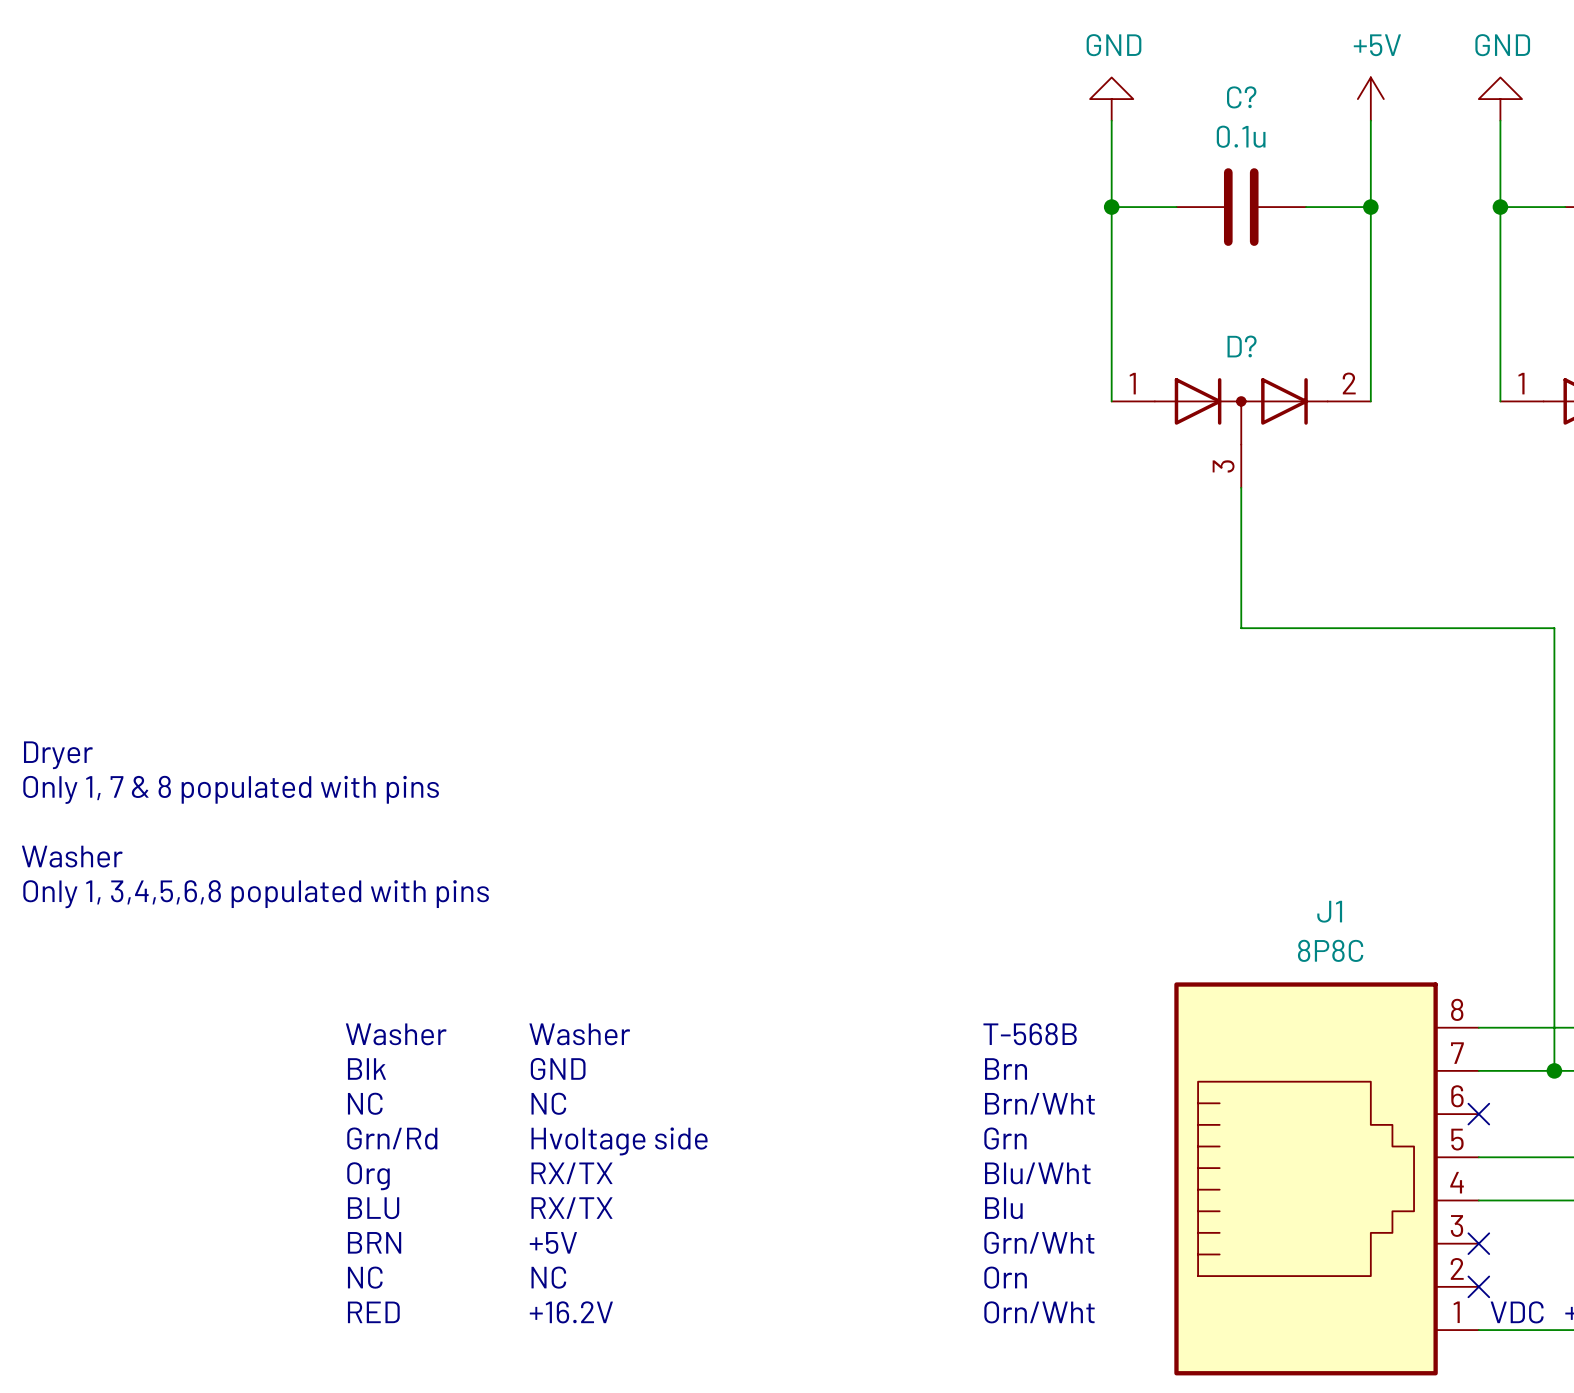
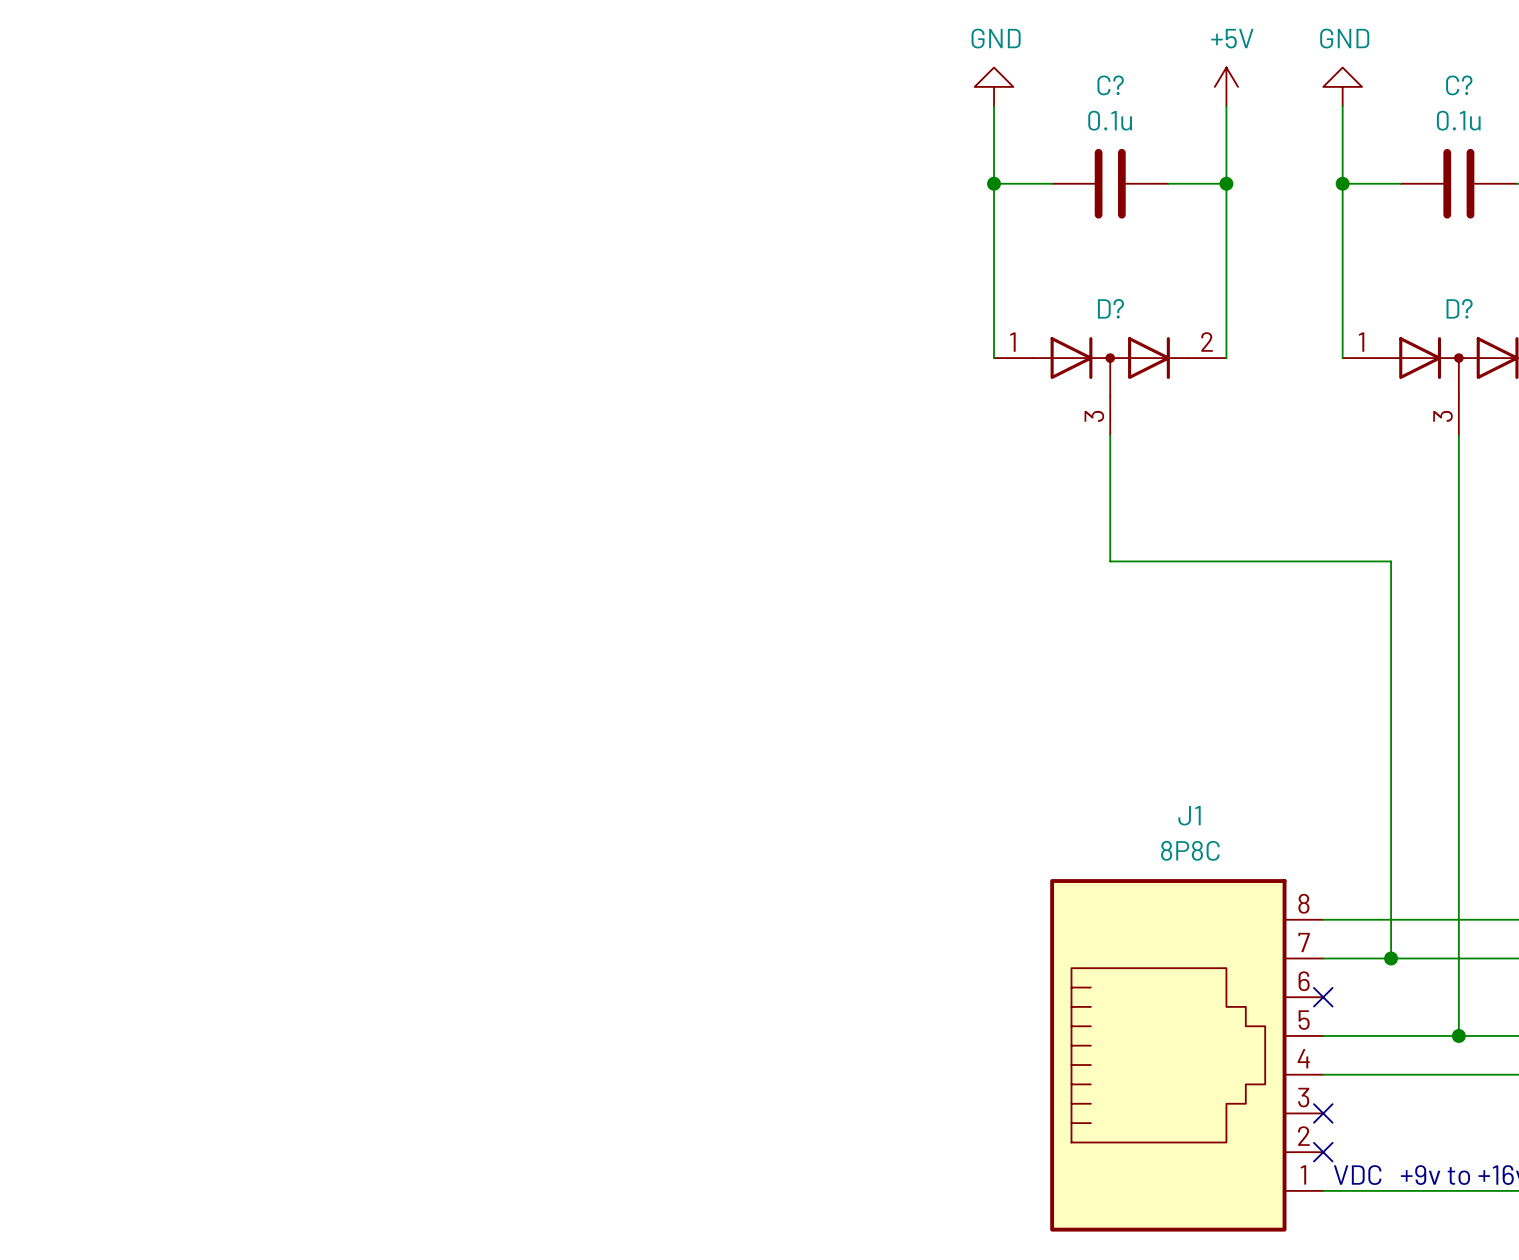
text: Dryer (58, 755) -> none
text: Only 1, 7 & 8 populated with pins (231, 789) -> none
text: Washer (72, 856) -> none
text: Only 1, 3,4,5,6,8 populated with pins (256, 894) -> none
text: Washer (396, 1034) -> none
text: Washer (579, 1034) -> none
text: T-568B (1030, 1034) -> none
text: Blk (366, 1068) -> none
text: GND (558, 1068) -> none
text: Brn (1006, 1068) -> none
text: NC (365, 1103) -> none
text: NC (548, 1103) -> none
text: Brn/Wht (1039, 1103) -> none
text: Grn/Rd (392, 1138) -> none
text: Grn (1005, 1138) -> none
text: Hvoltage side (619, 1141) -> none
text: RX/TX (572, 1173) -> none
text: Blu/Wht (1037, 1173) -> none
text: Org (368, 1176) -> none
text: BLU (373, 1208) -> none
text: RX/TX (572, 1208) -> none
text: Blu (1003, 1208) -> none
text: BRN (374, 1242) -> none
text: +5V (553, 1242) -> none
text: Grn/Wht (1039, 1242) -> none
text: NC (365, 1277) -> none
text: NC (548, 1277) -> none
text: Orn (1005, 1277) -> none
text: RED (373, 1312) -> none
text: +16.2V (571, 1312) -> none
text: Orn/Wht (1039, 1312) -> none

